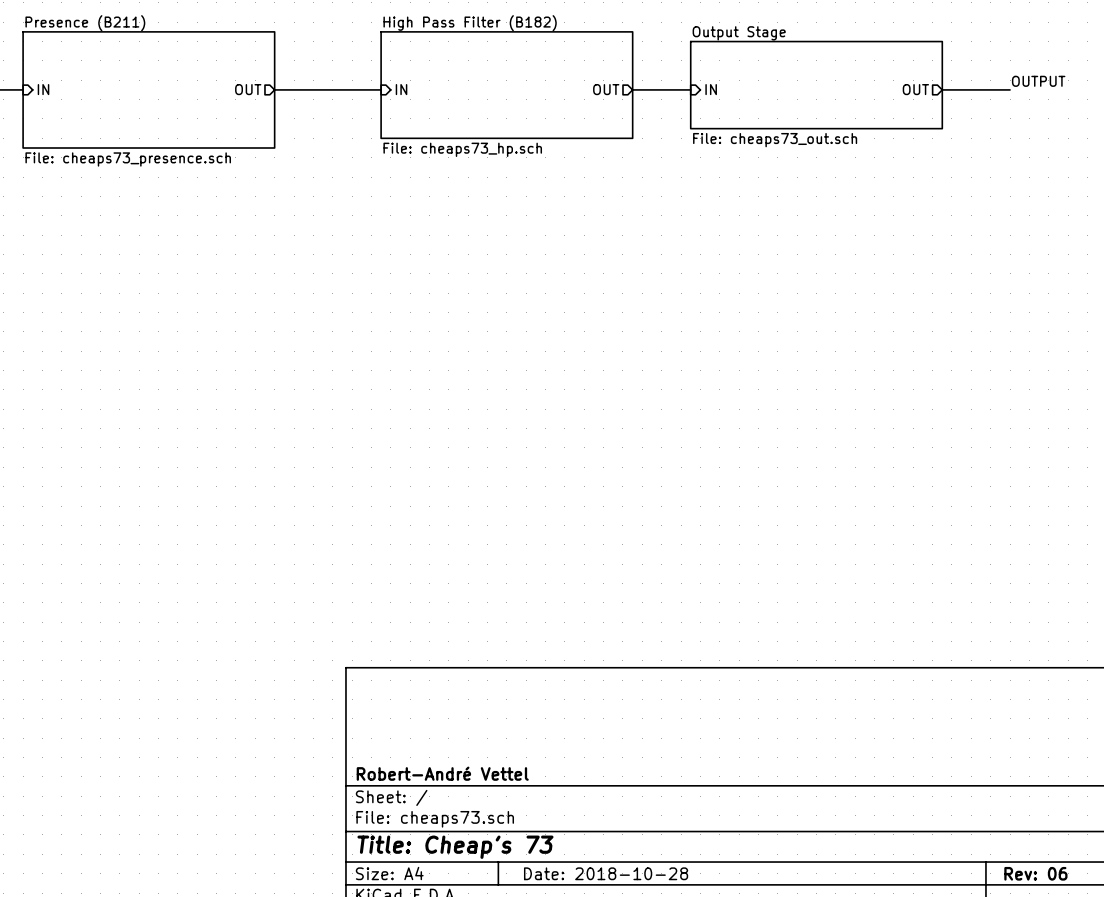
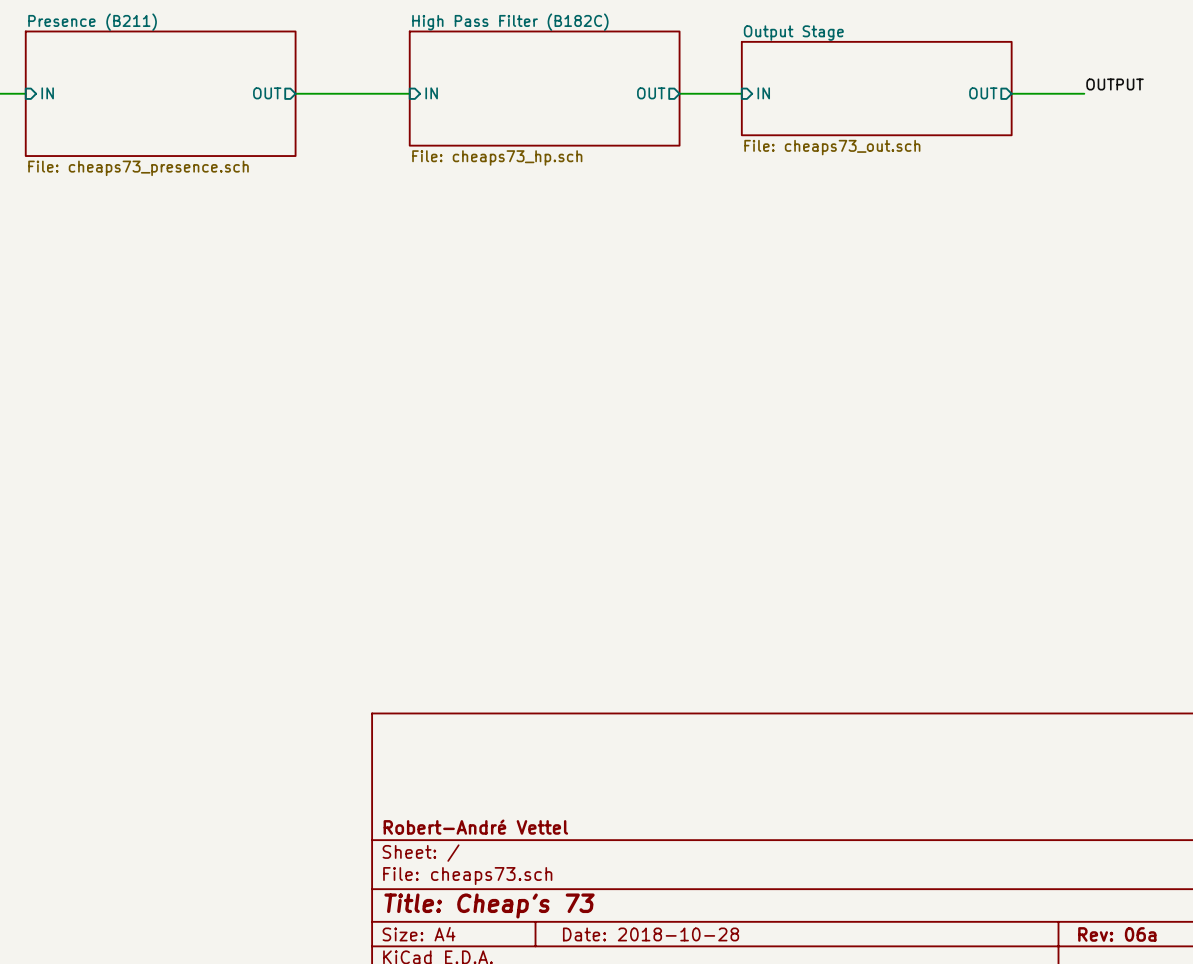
sheet High Pass Filter (B182) name: High Pass Filter (B182) (470, 23) -> High Pass Filter (B182C) (510, 22)
title block: Rev: 06 (1035, 873) -> Rev: 06a (1117, 934)

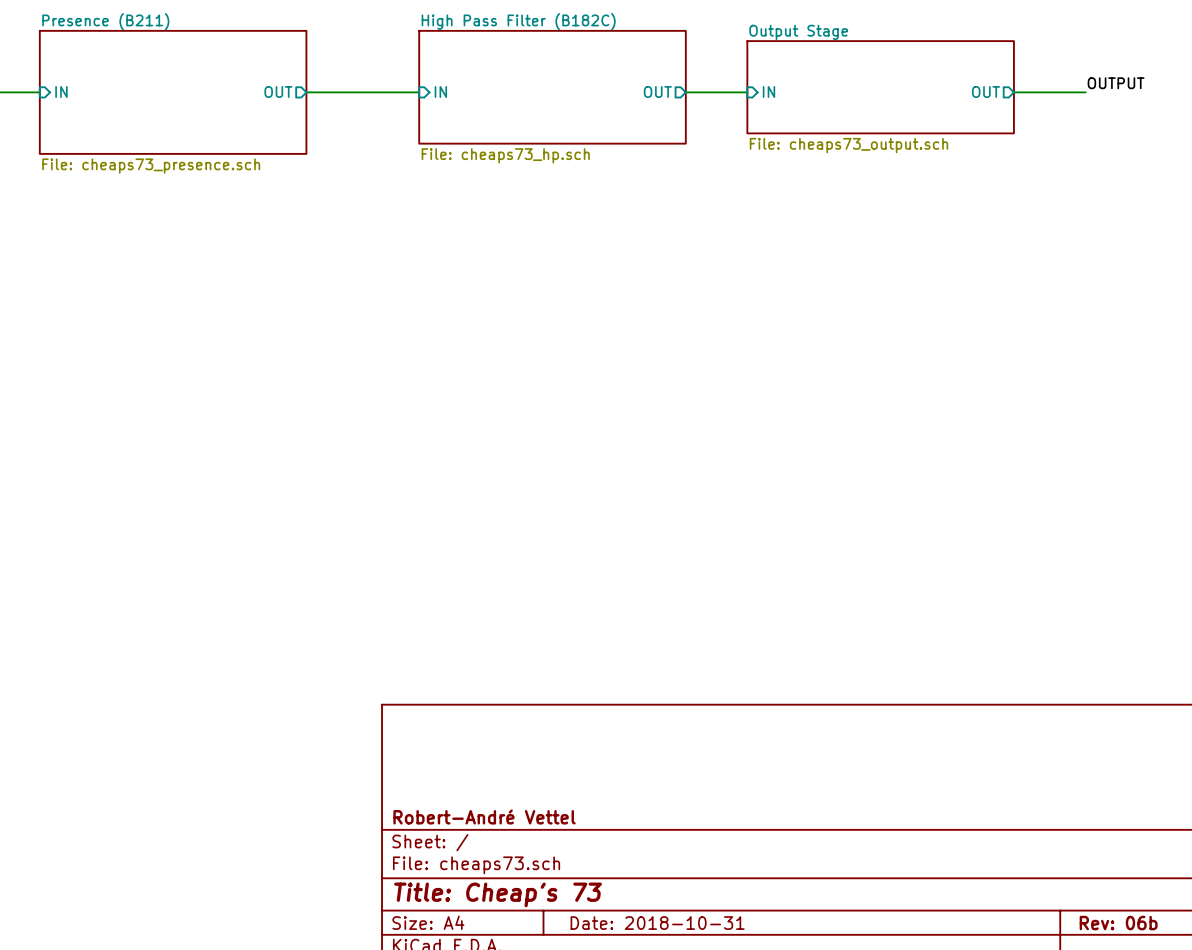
sheet Output Stage value: File: cheaps73_out.sch (832, 147) -> File: cheaps73_output.sch (848, 145)
title block: Date: 2018-10-28 (651, 934) -> Date: 2018-10-31 (657, 923)
title block: Rev: 06a (1117, 934) -> Rev: 06b (1118, 923)

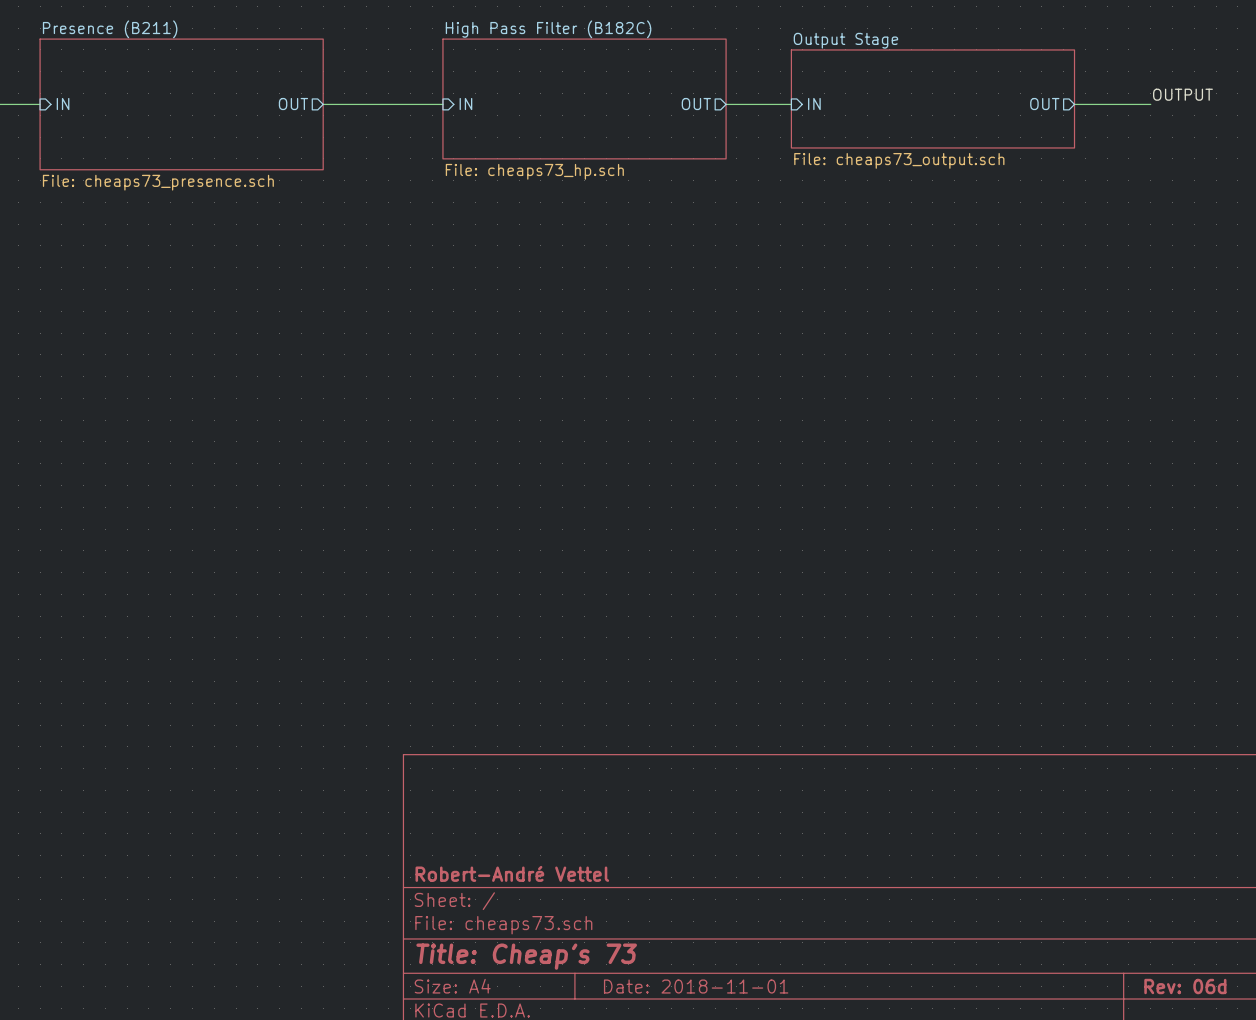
title block: Date: 2018-10-31 (657, 923) -> Date: 2018-11-01 (696, 986)
title block: Rev: 06b (1118, 923) -> Rev: 06d (1185, 986)

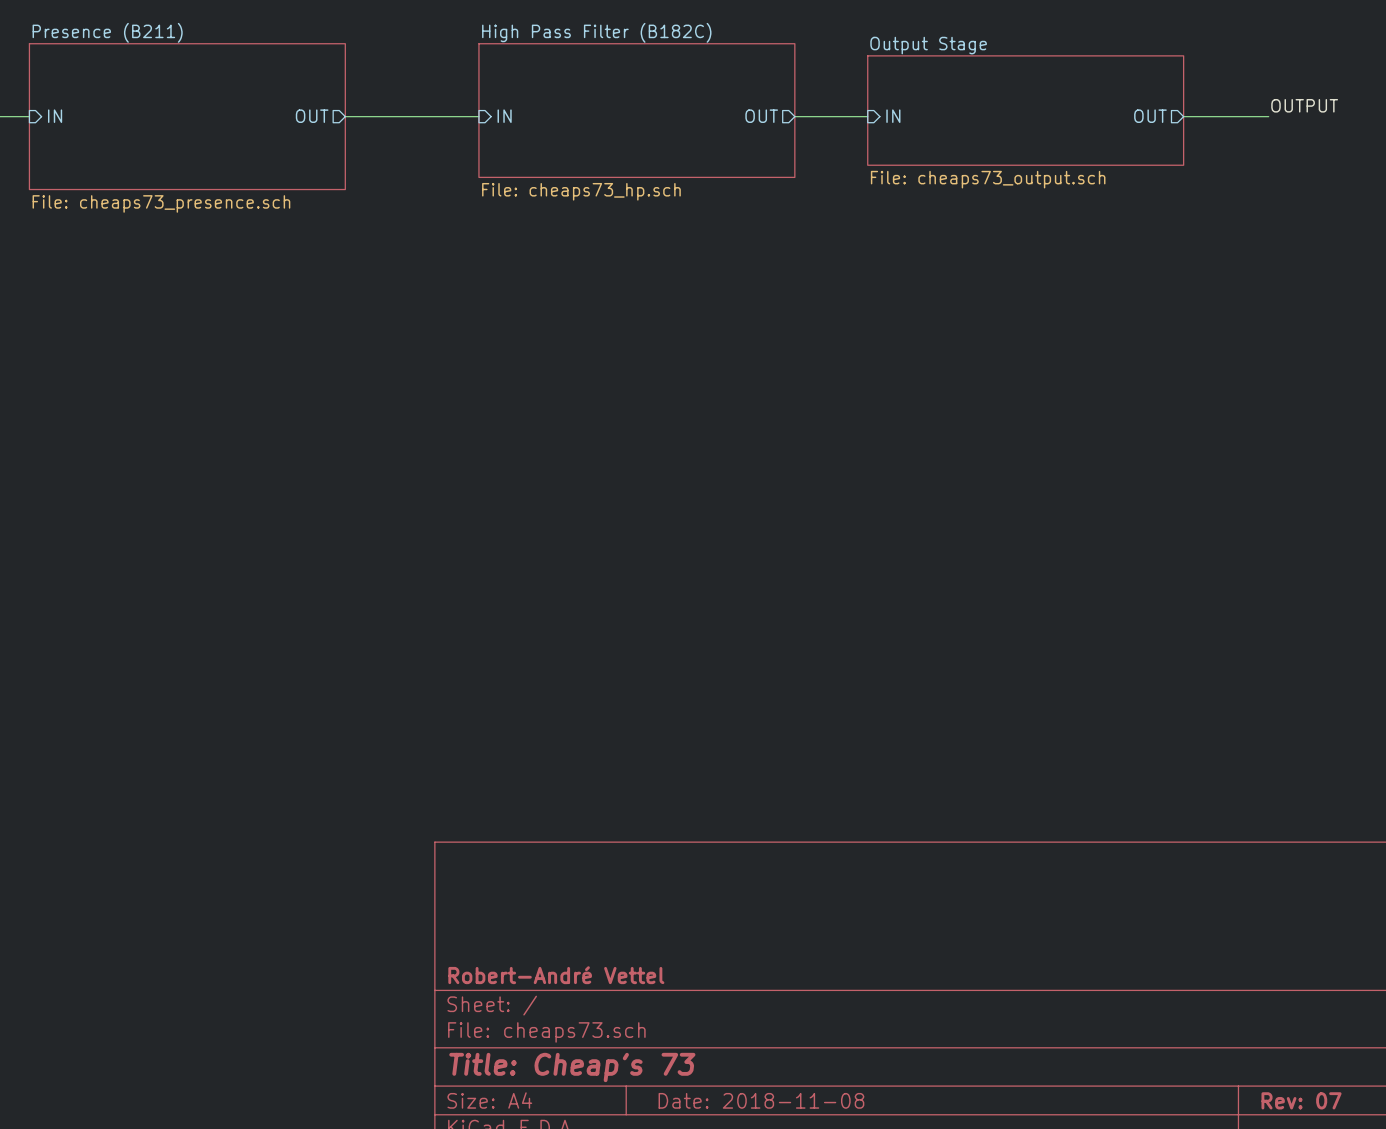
title block: Date: 2018-11-01 (696, 986) -> Date: 2018-11-08 (761, 1100)
title block: Rev: 06d (1185, 986) -> Rev: 07 (1301, 1100)

